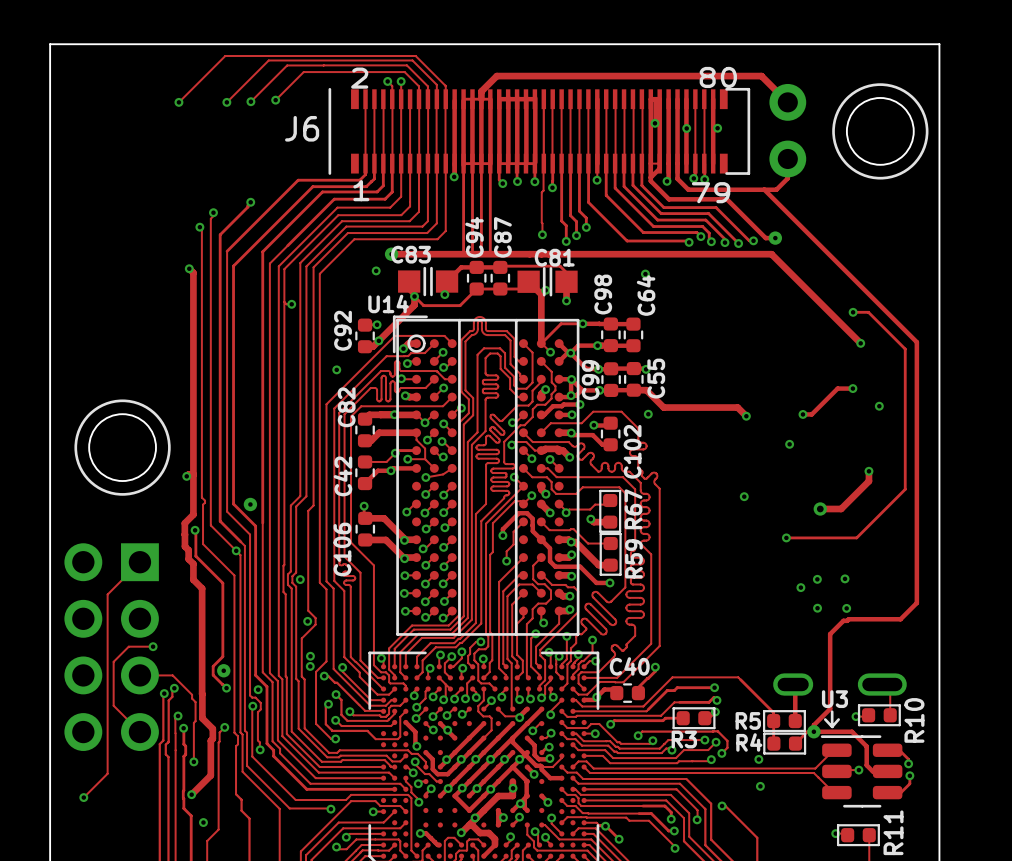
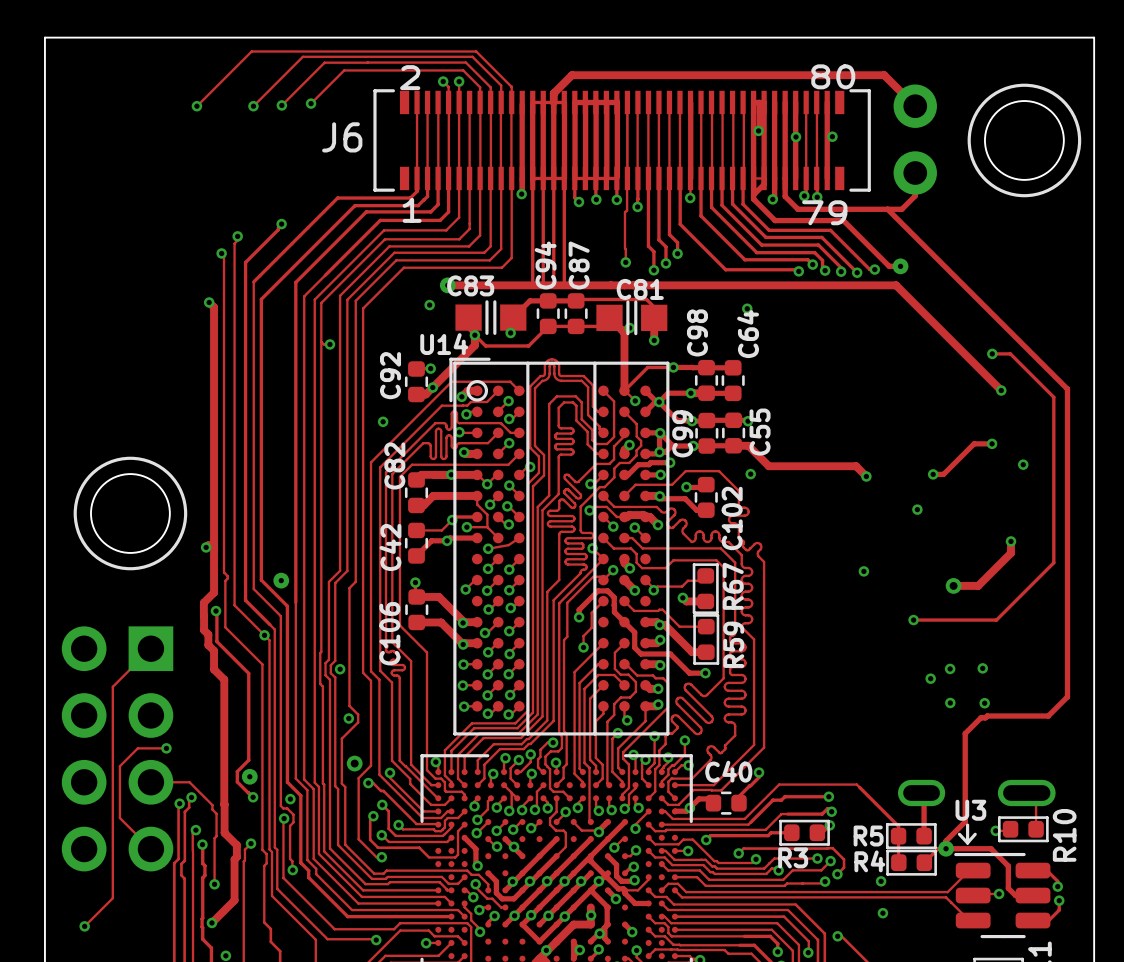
J6 footprint: [328, 87, 751, 175] -> [373, 89, 871, 192]
via: (310, 656) -> none
via: none -> (354, 763)
via: (310, 666) -> none

